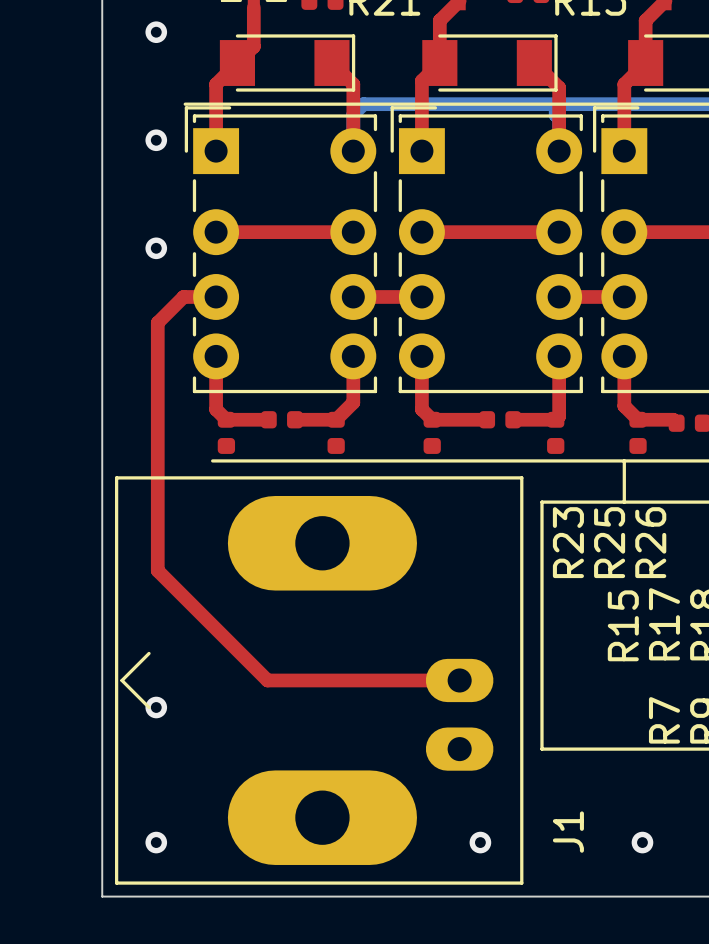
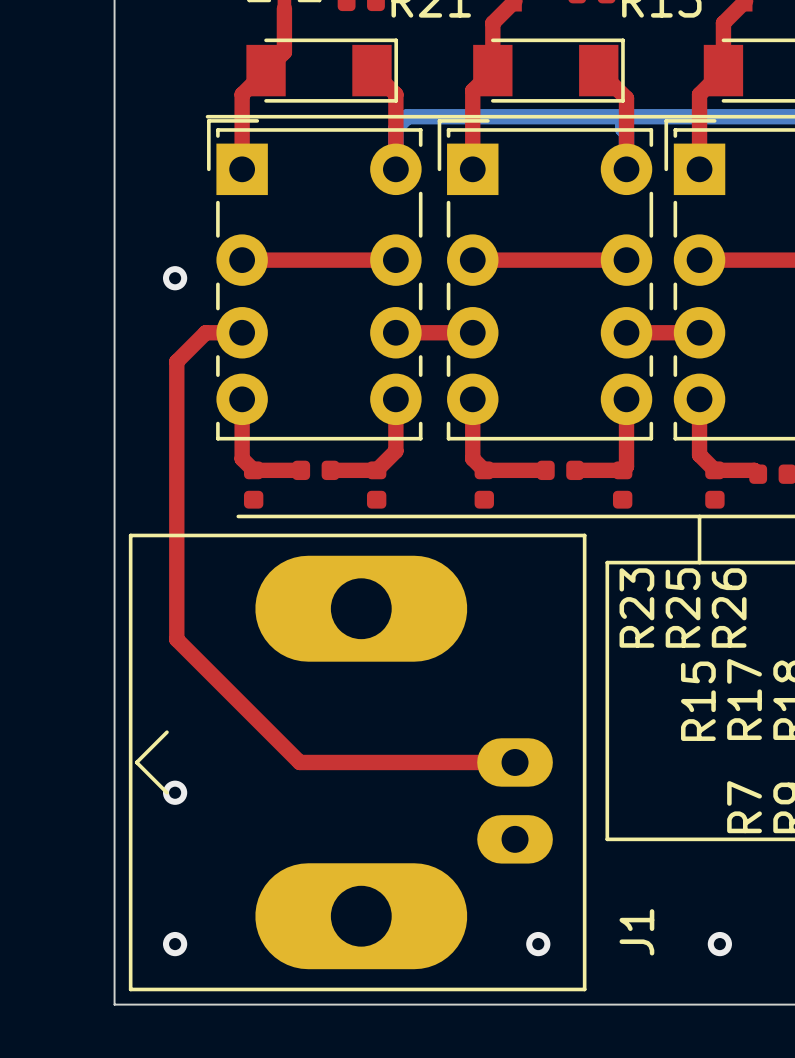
via: (156, 32) -> none
via: (156, 140) -> none

